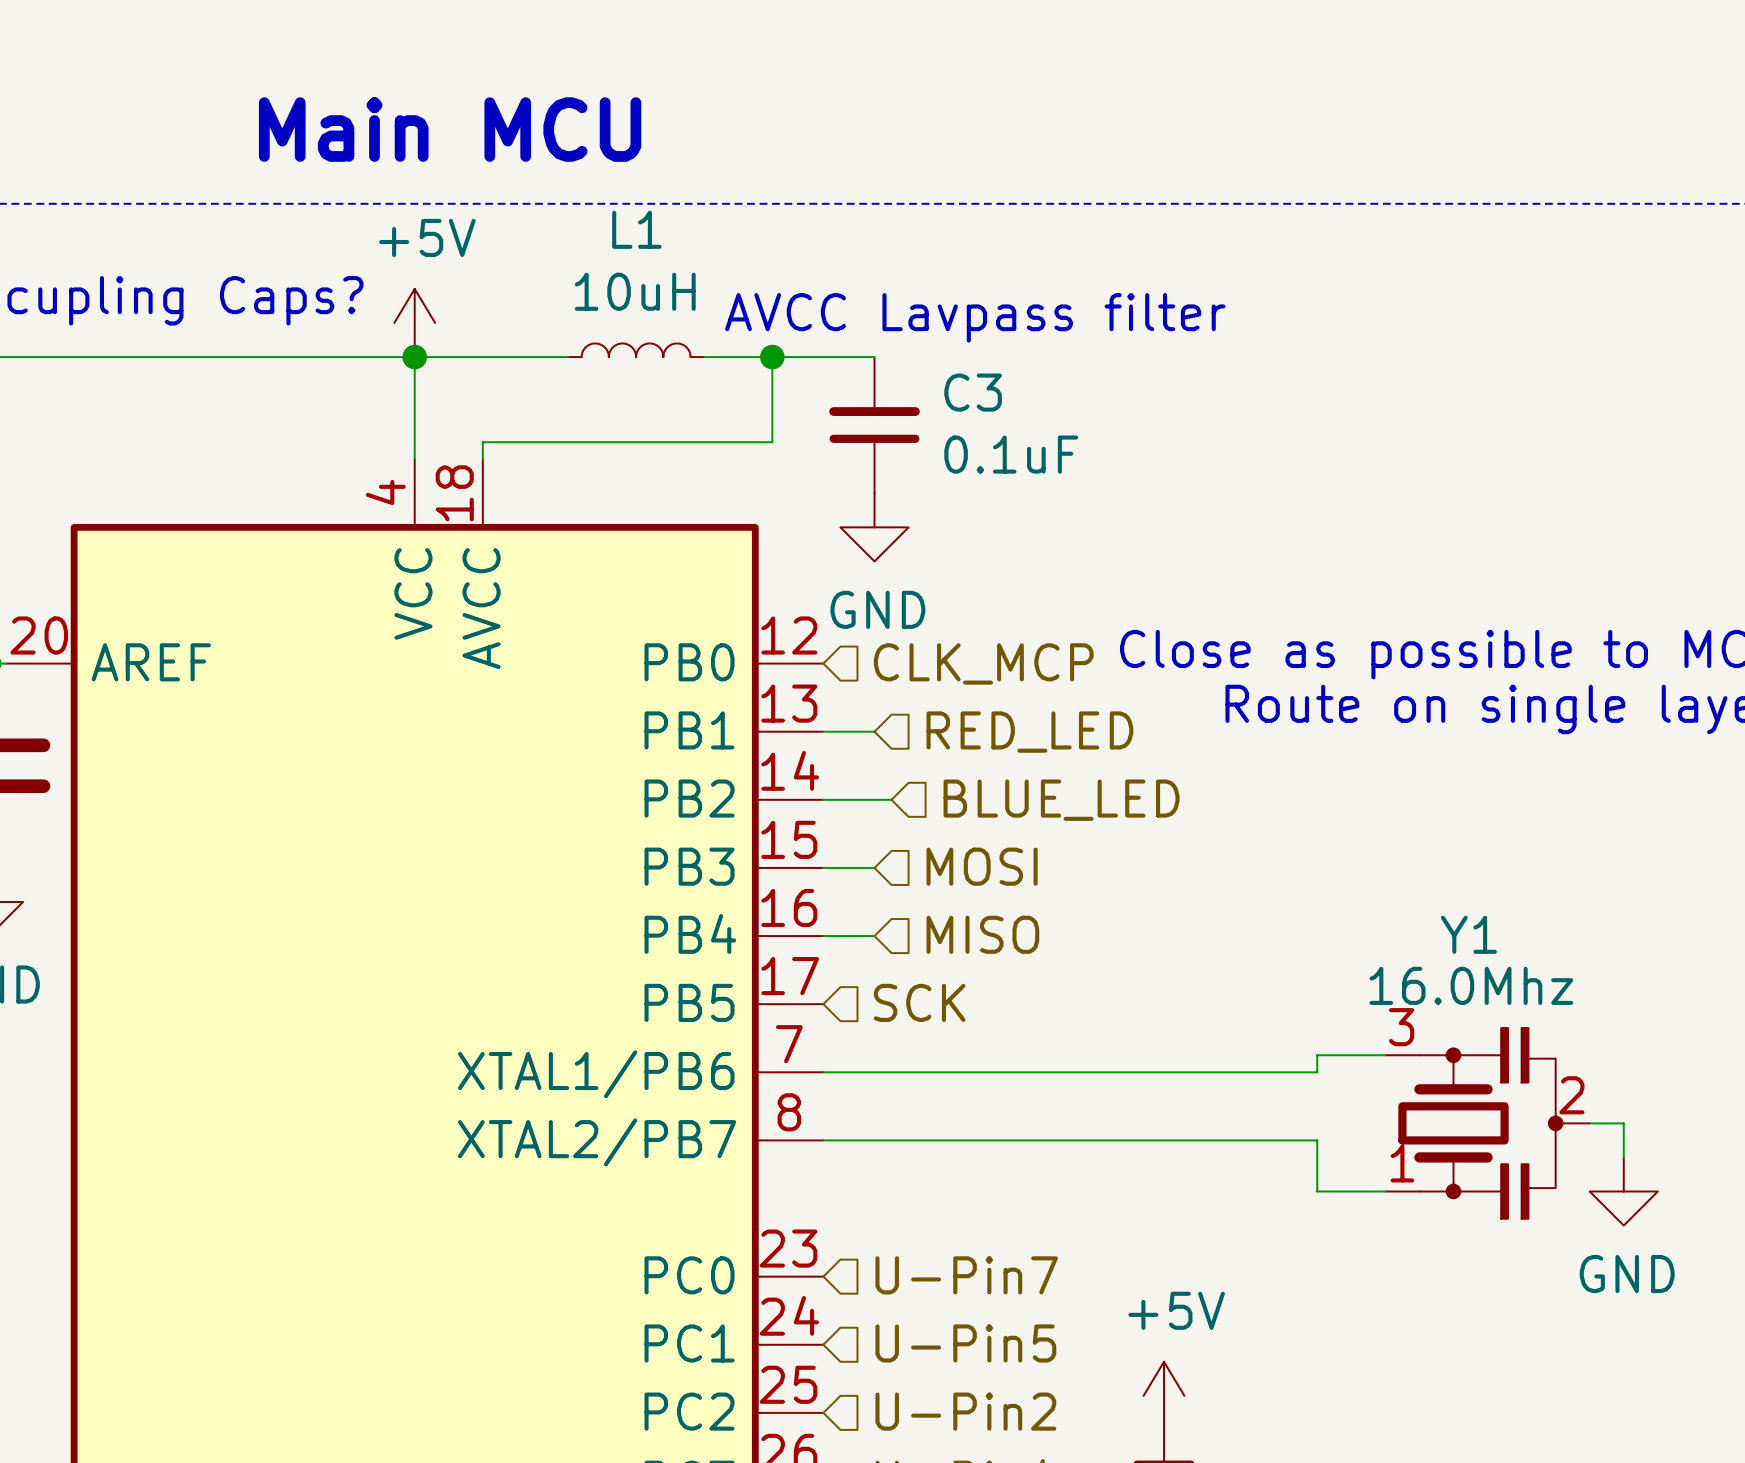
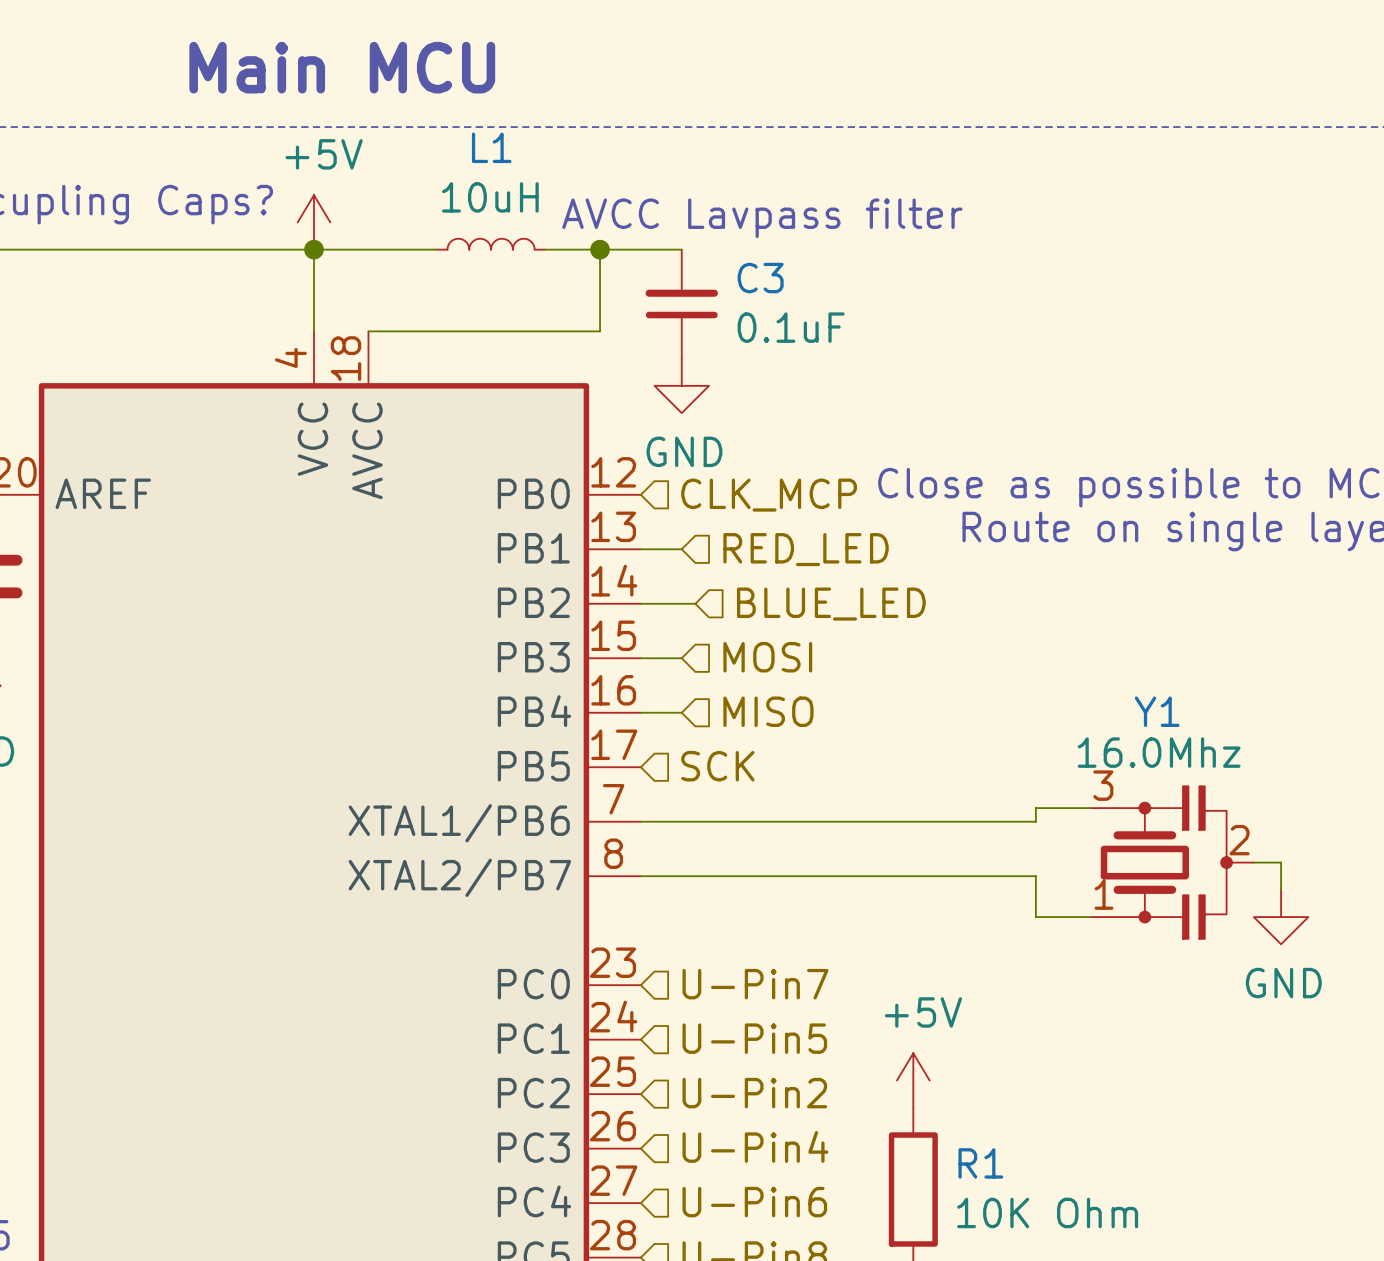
wire: (772, 442) (482, 442) (482, 459) -> (600, 317) (600, 331) (368, 331)

